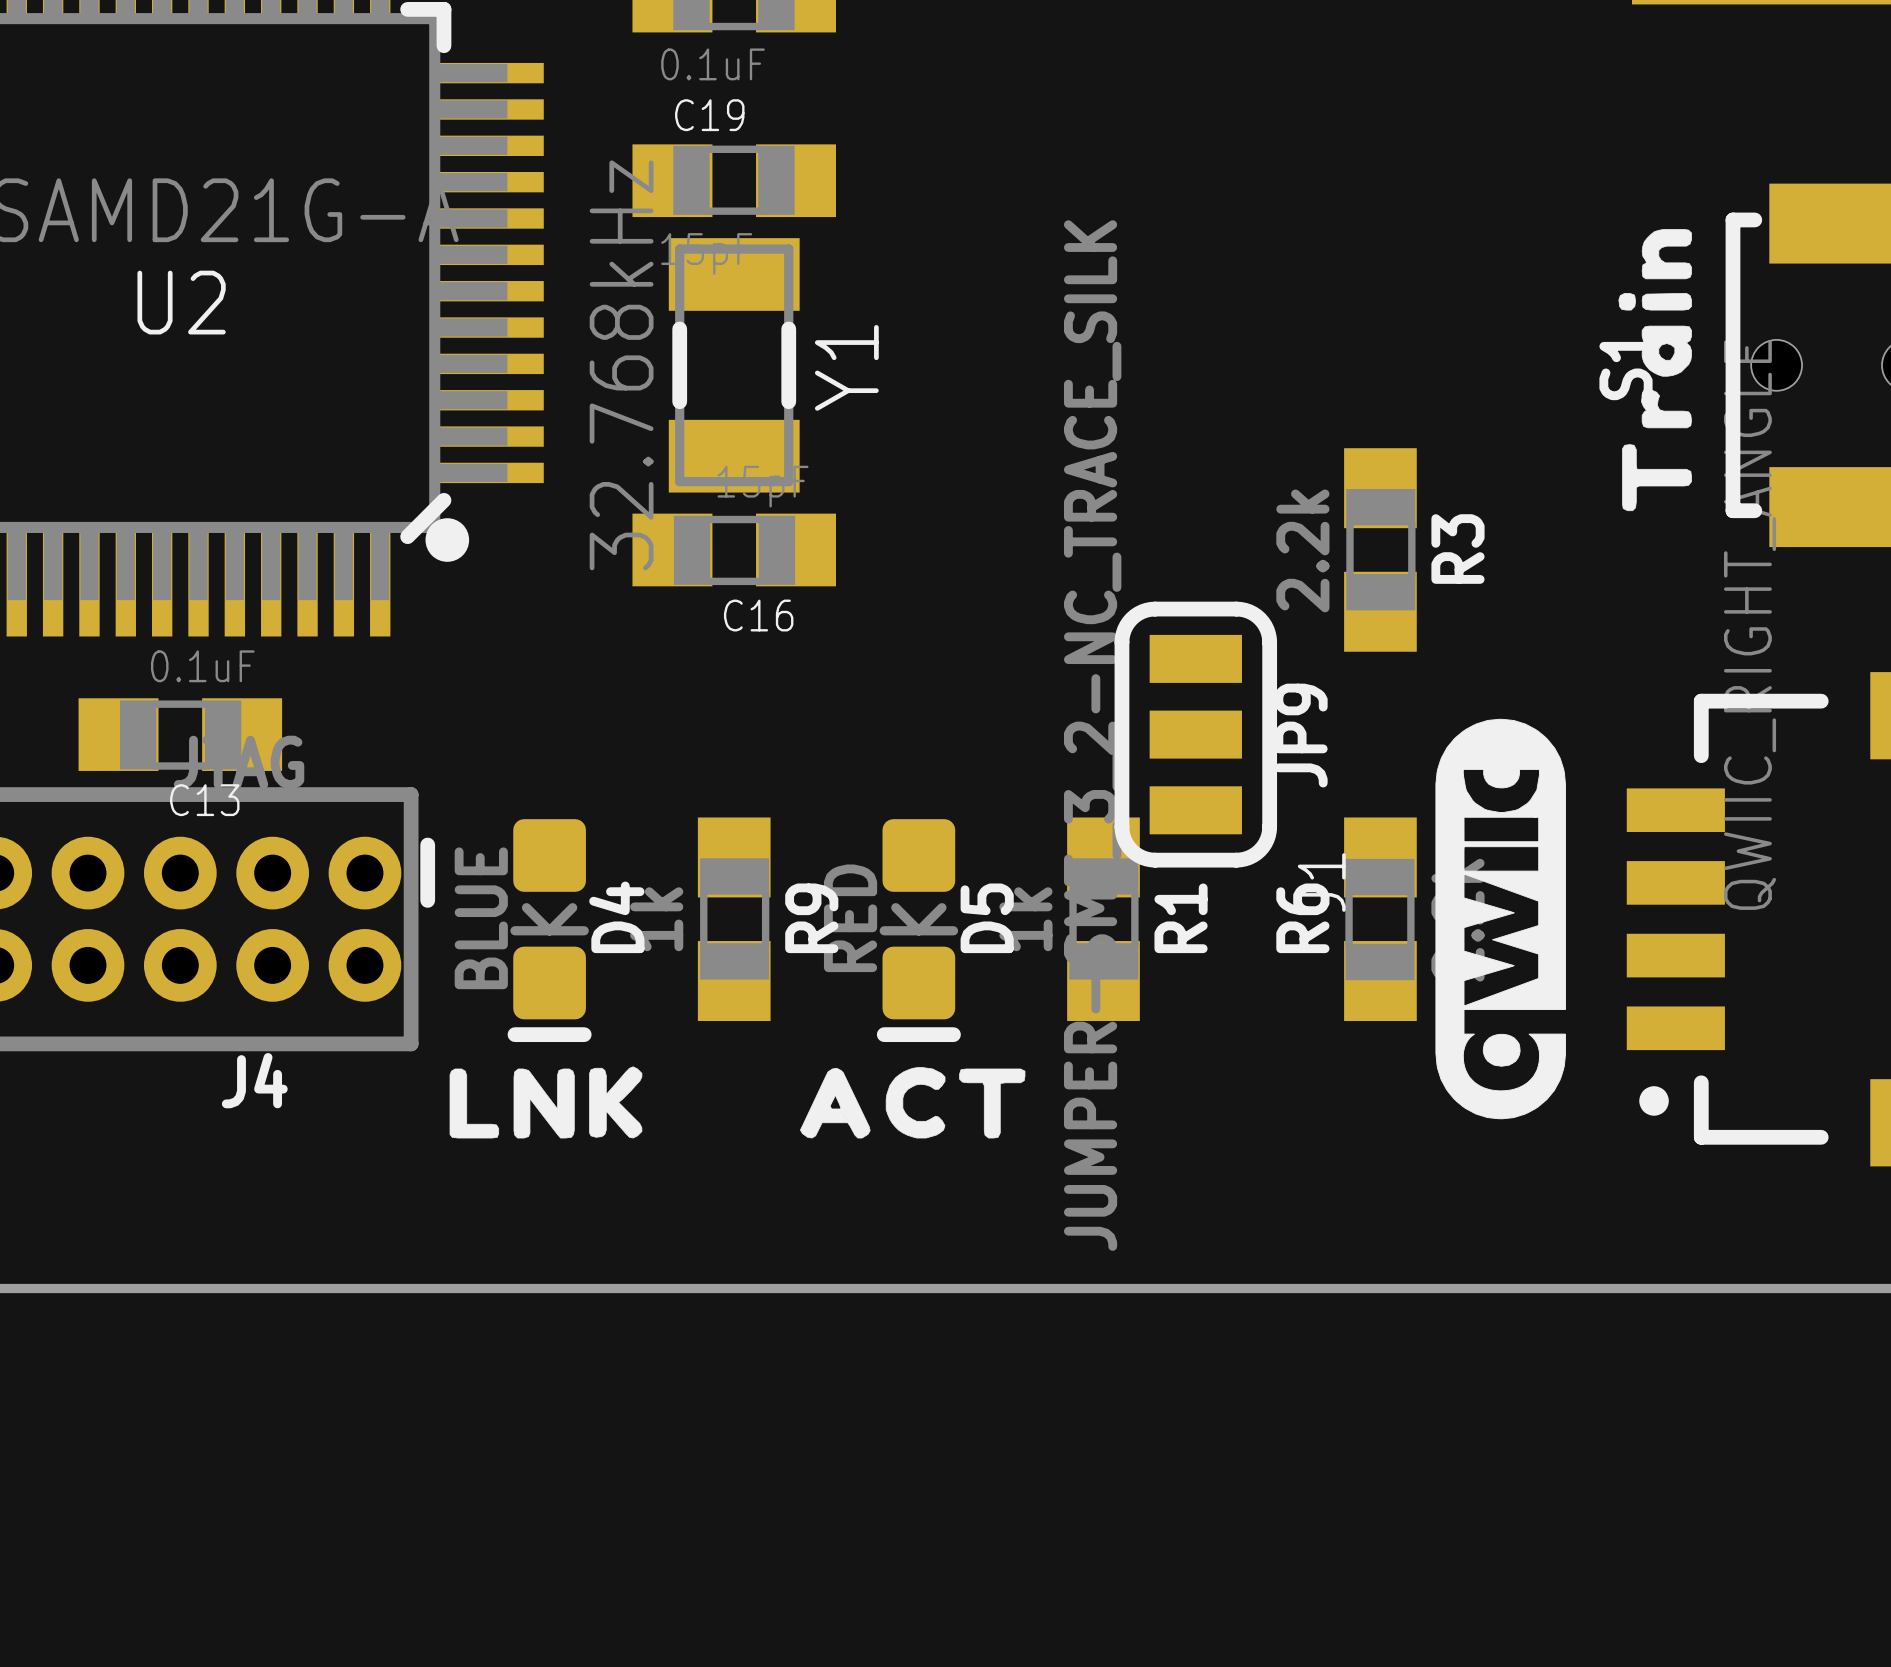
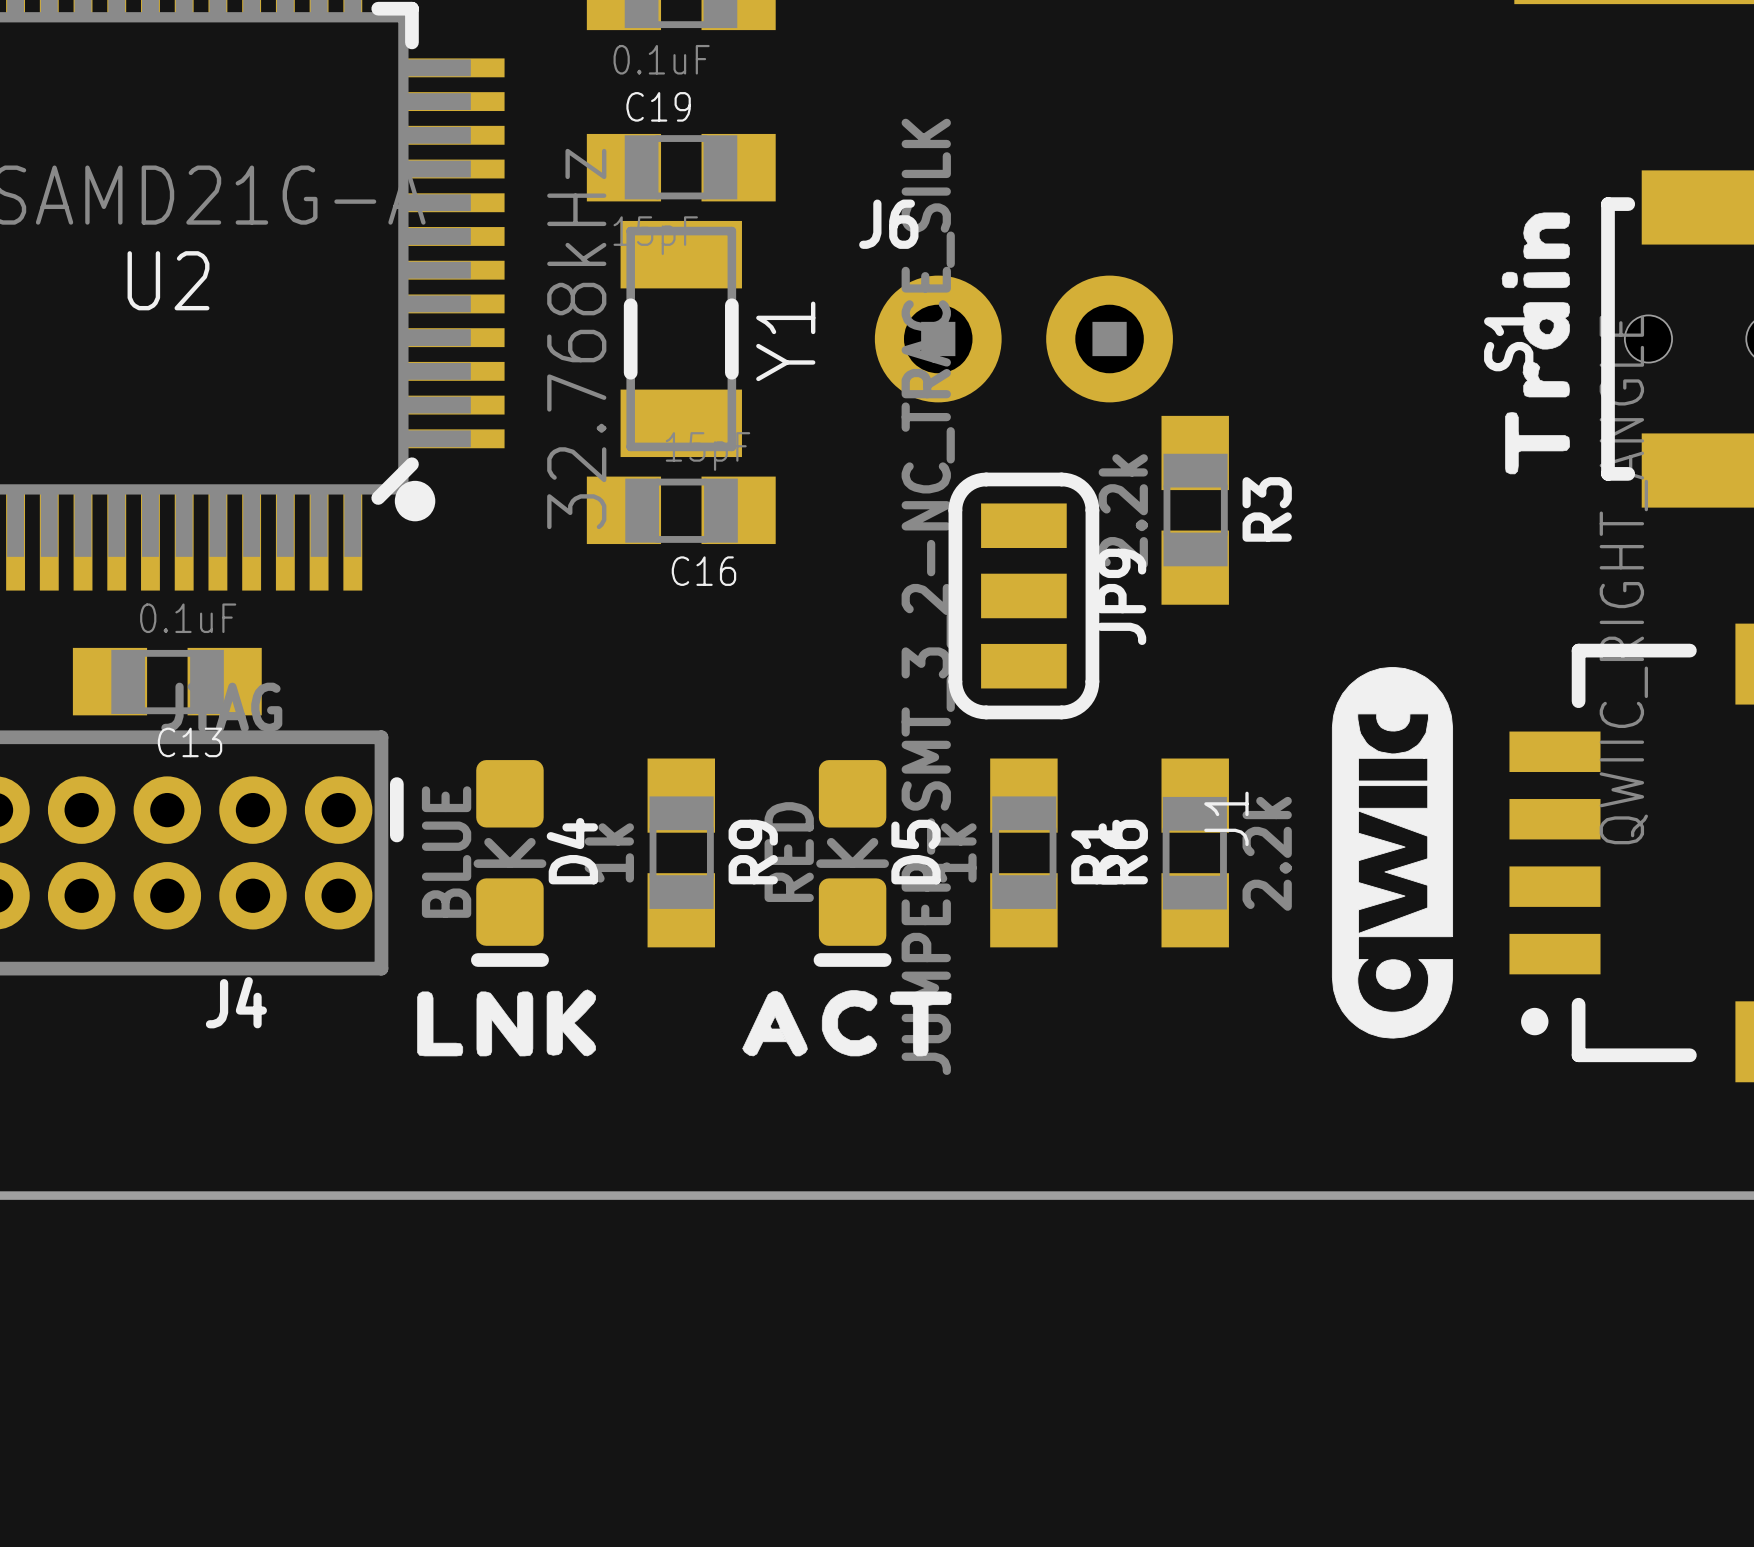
J6: none -> (1023, 338)
R3 position: (1380, 549) -> (1195, 510)
JP9 position: (1195, 734) -> (1023, 595)
R6 position: (1380, 919) -> (1195, 852)

